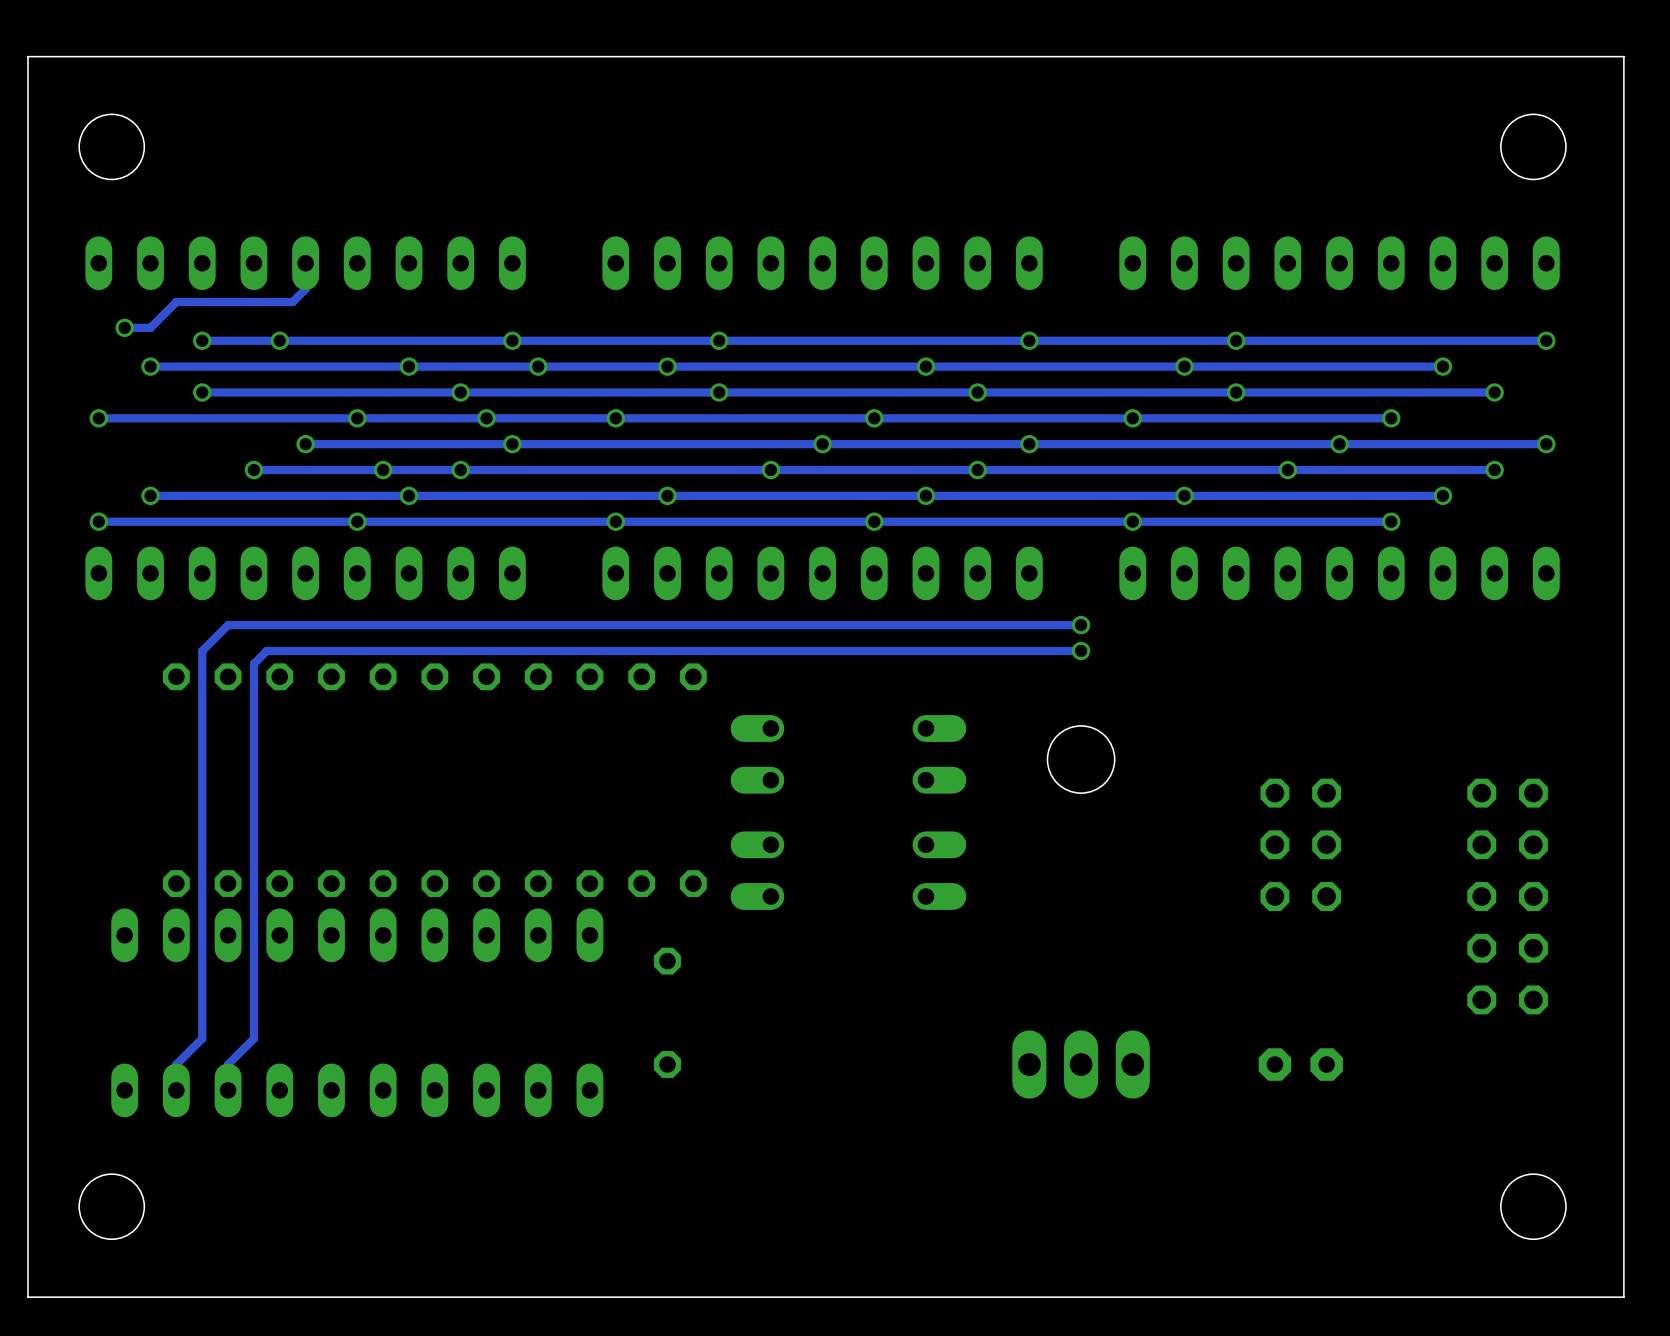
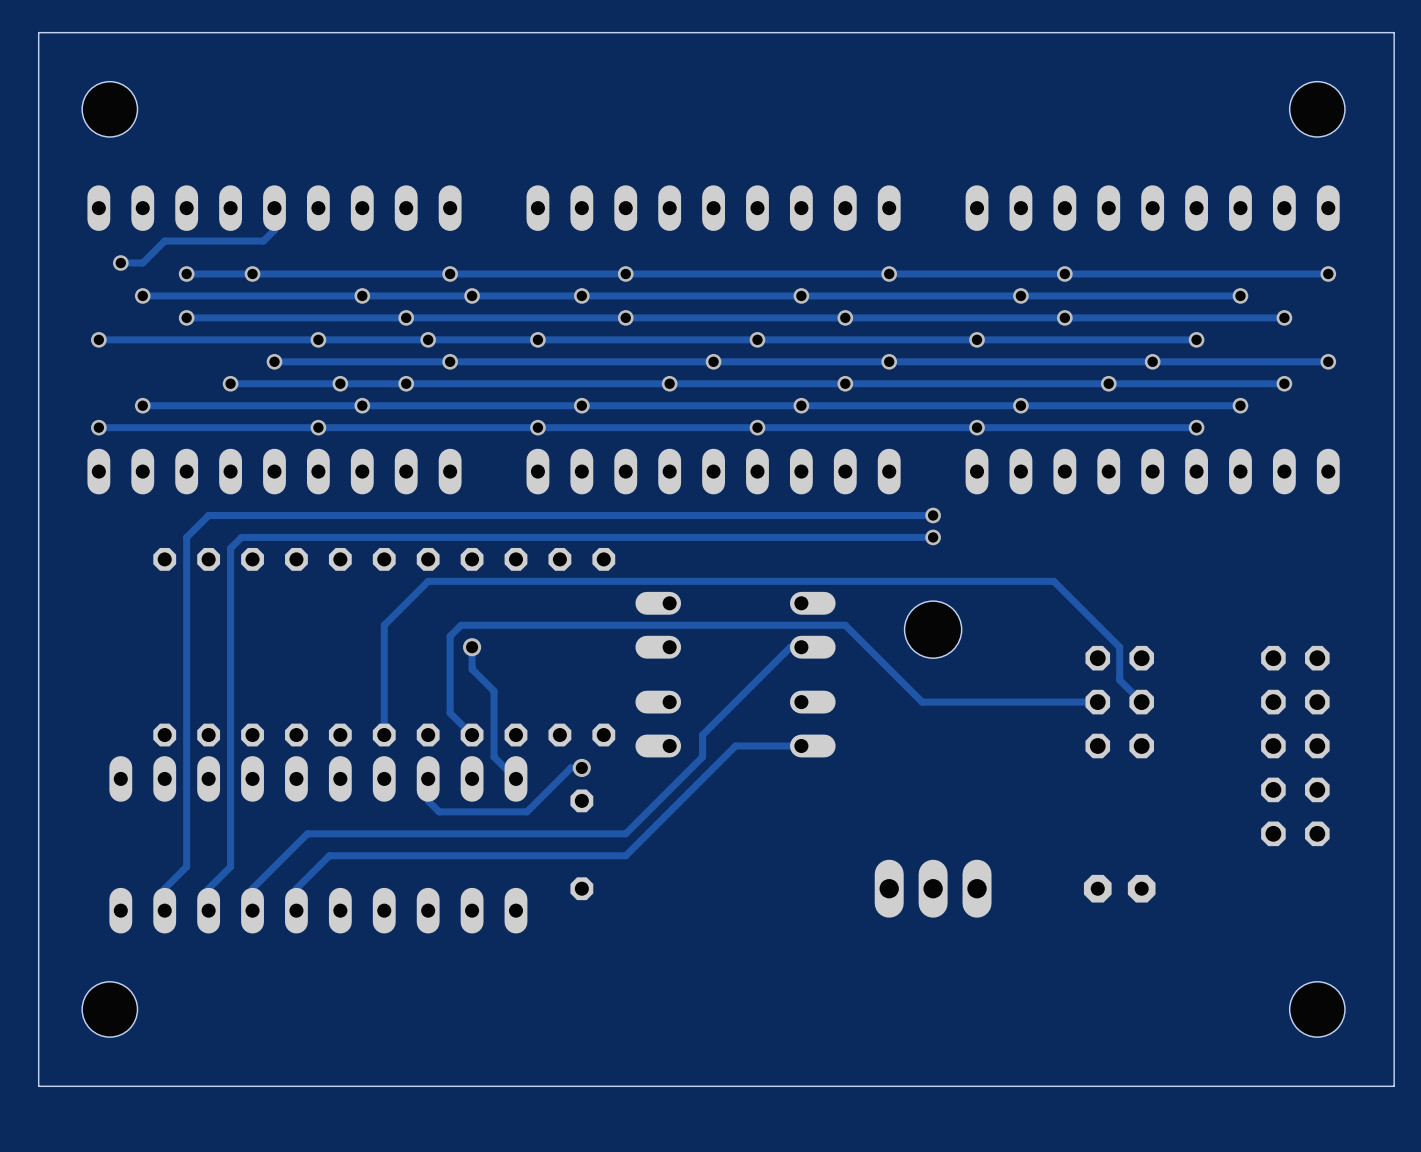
track: none -> (472, 647) (472, 669) (494, 691) (494, 756) (515, 778)
via: none -> (472, 647)
track: none -> (801, 647) (790, 647) (702, 735) (702, 756) (625, 833) (307, 833) (252, 888) (252, 910)
track: none -> (1097, 702) (922, 702) (845, 625) (461, 625) (450, 636) (450, 713) (472, 735)
track: none -> (1141, 702) (1119, 680) (1119, 647) (1053, 581) (428, 581) (384, 625) (384, 735)
track: none -> (801, 746) (735, 746) (625, 855) (329, 855) (296, 888) (296, 910)
track: none -> (581, 767) (570, 767) (526, 811) (439, 811) (428, 800) (428, 778)
via: none -> (581, 767)

